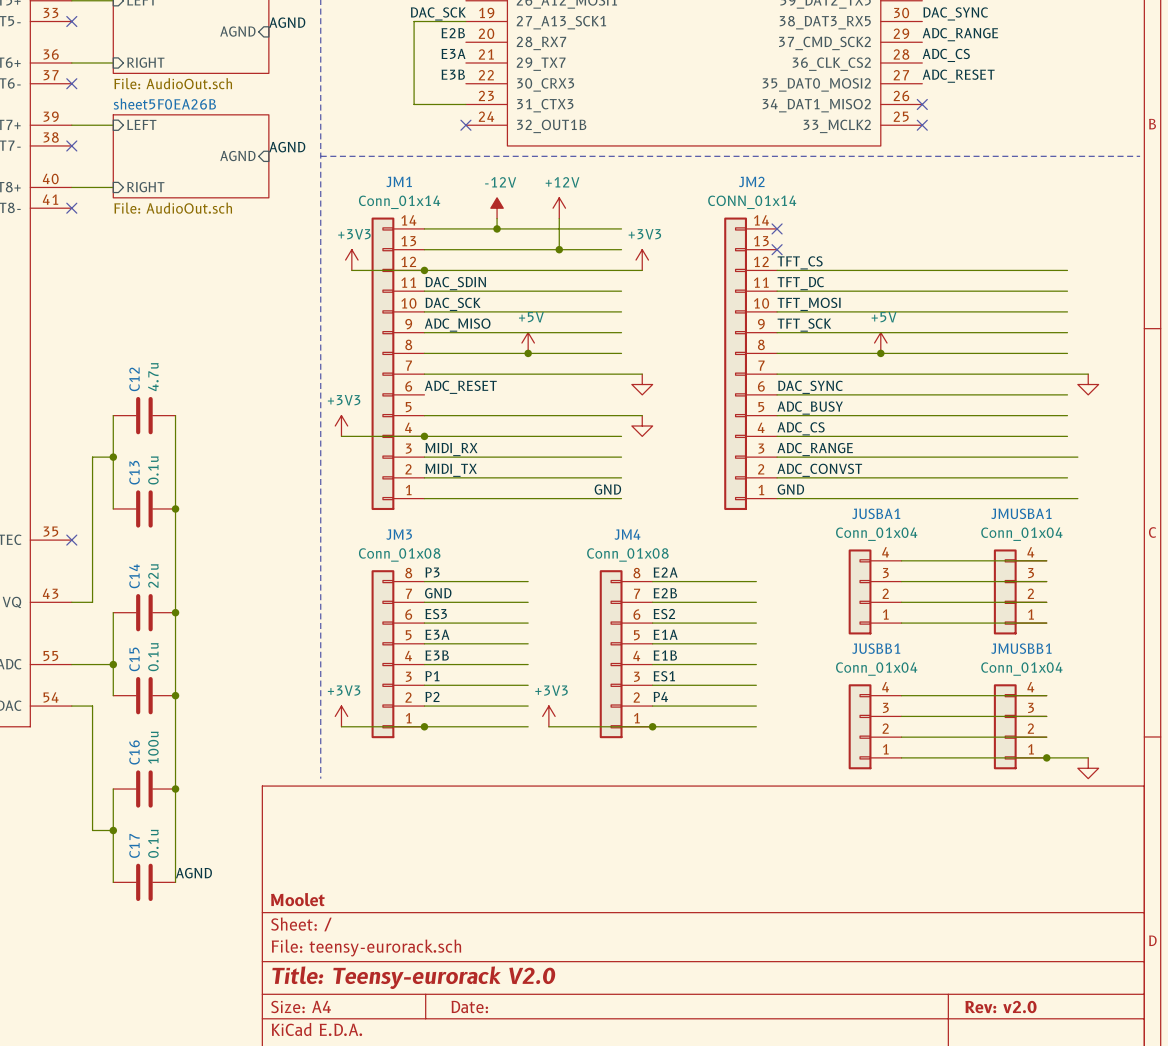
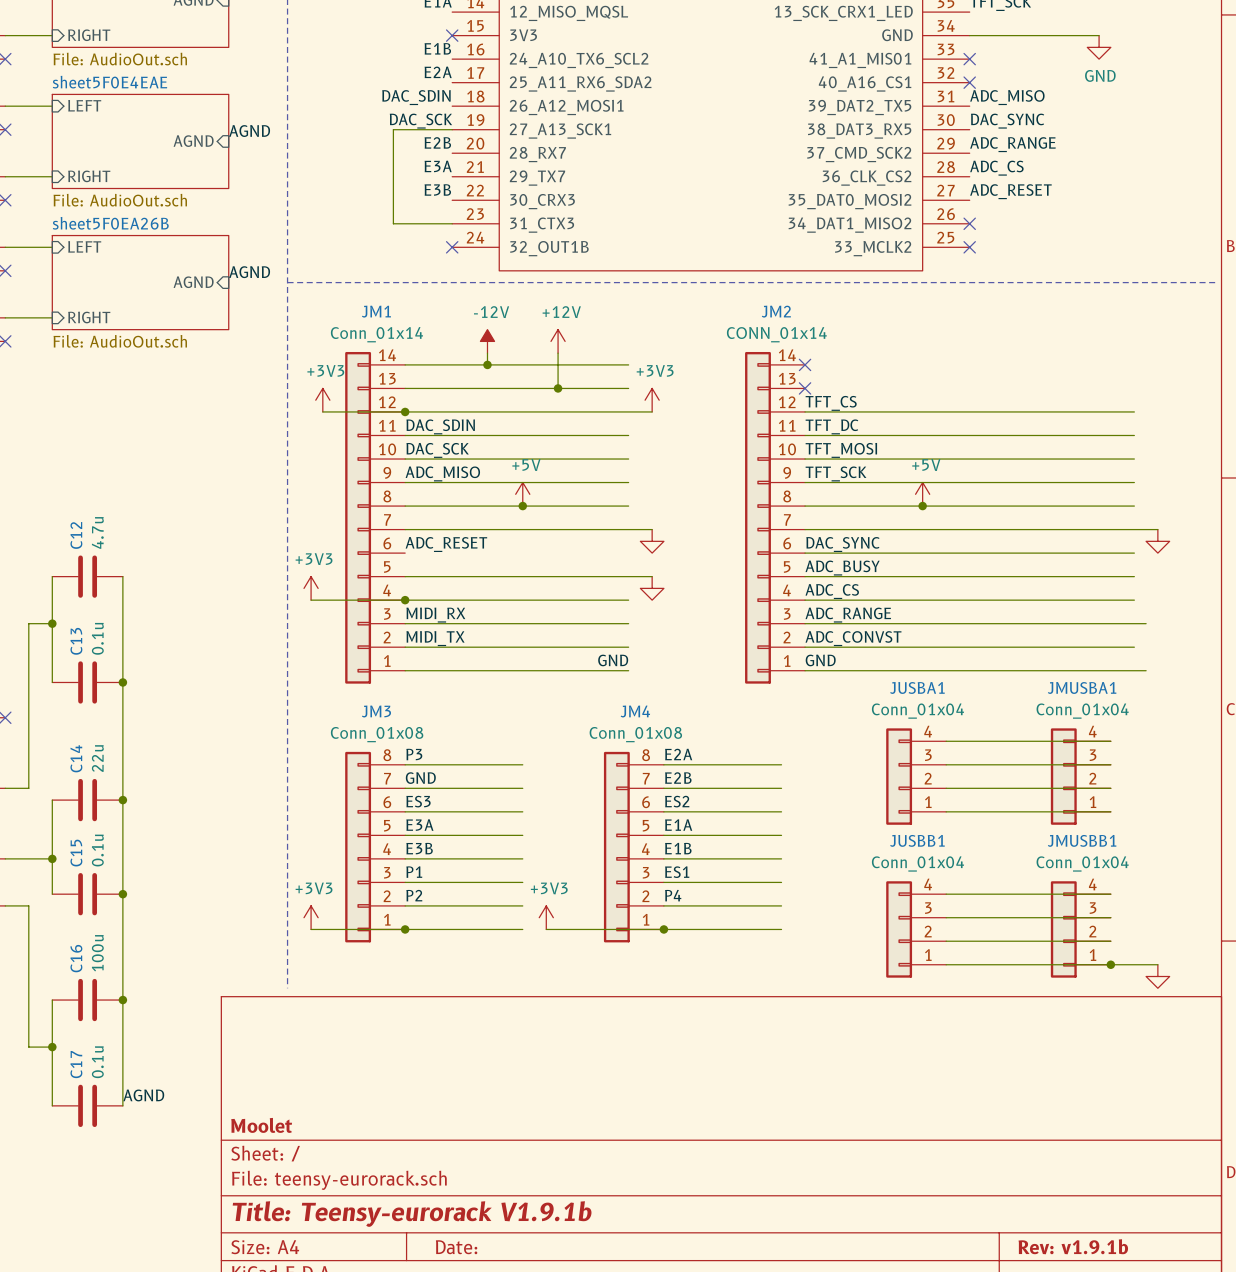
title block: Title: Teensy-eurorack V2.0 (413, 977) -> Title: Teensy-eurorack V1.9.1b (412, 1214)
title block: Rev: v2.0 (1000, 1007) -> Rev: v1.9.1b (1073, 1246)

